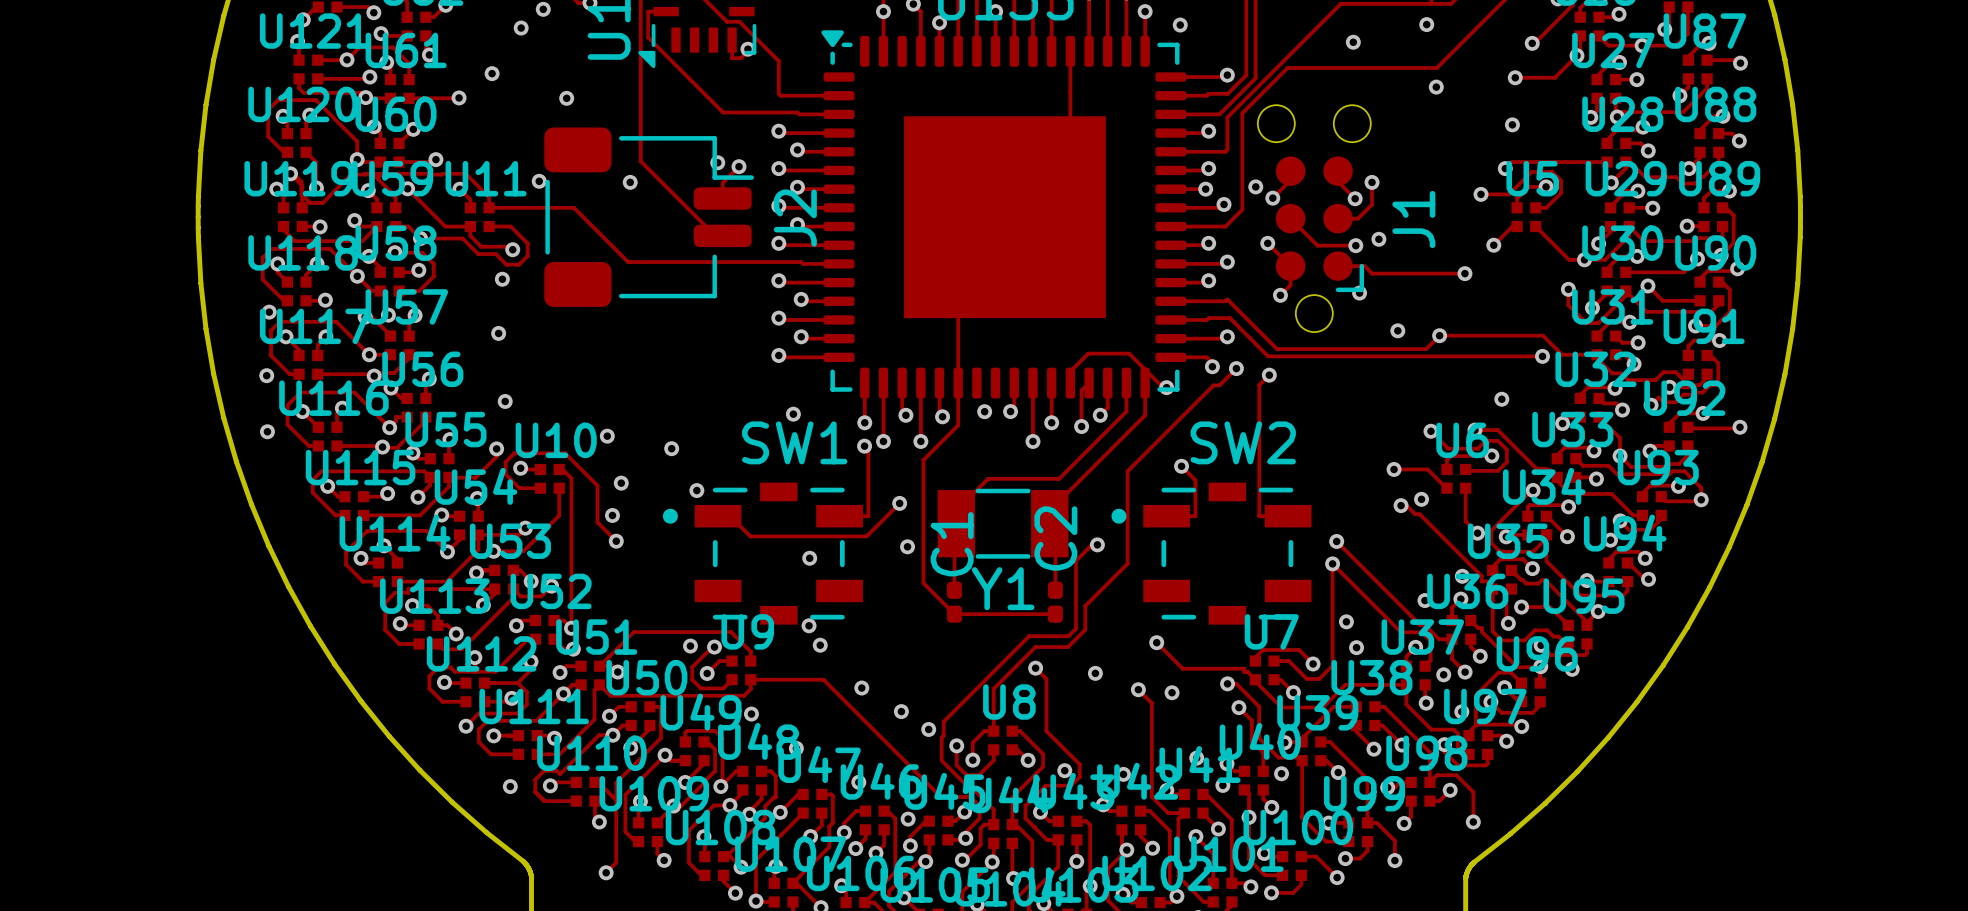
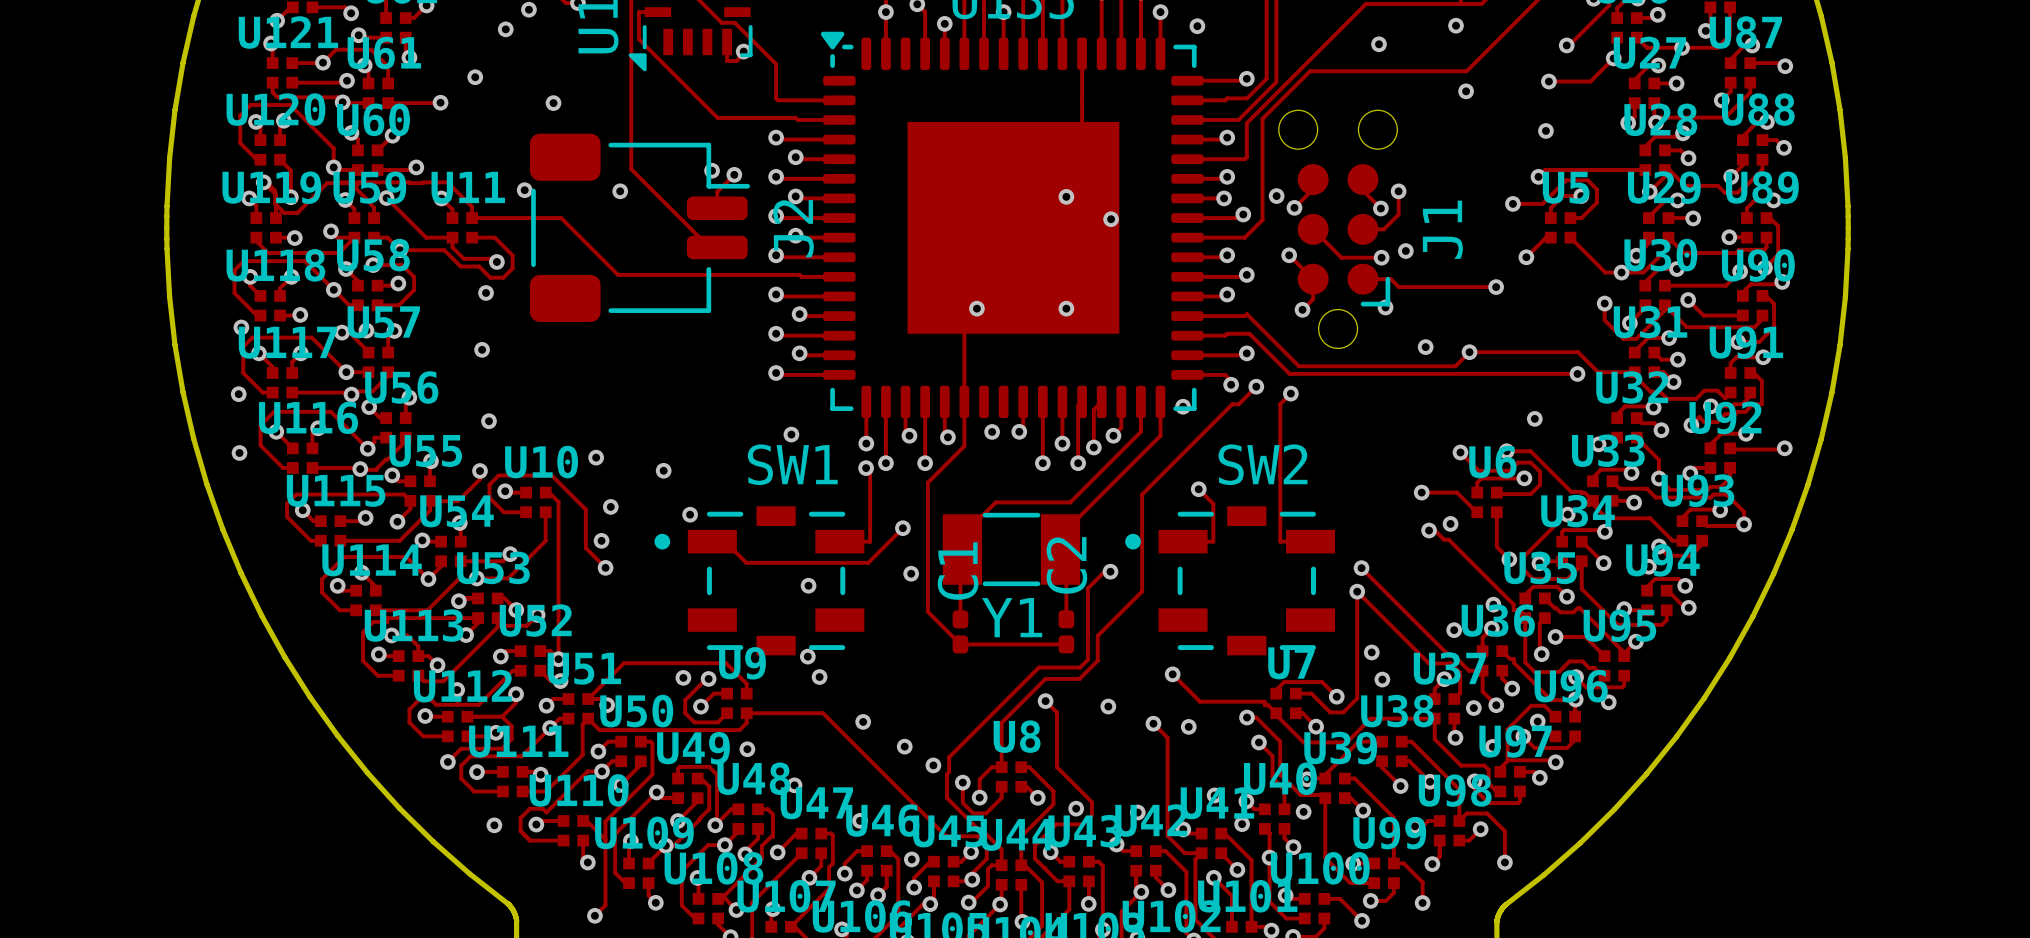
via: none -> (1066, 196)
via: none -> (1111, 219)
via: none -> (976, 308)
via: none -> (1066, 308)
track: (1070, 371) (1088, 353) (1129, 353) (1163, 387) (1166, 387) -> none
track: none -> (1082, 401) (1078, 405) (1078, 463)
via: none -> (1078, 463)

